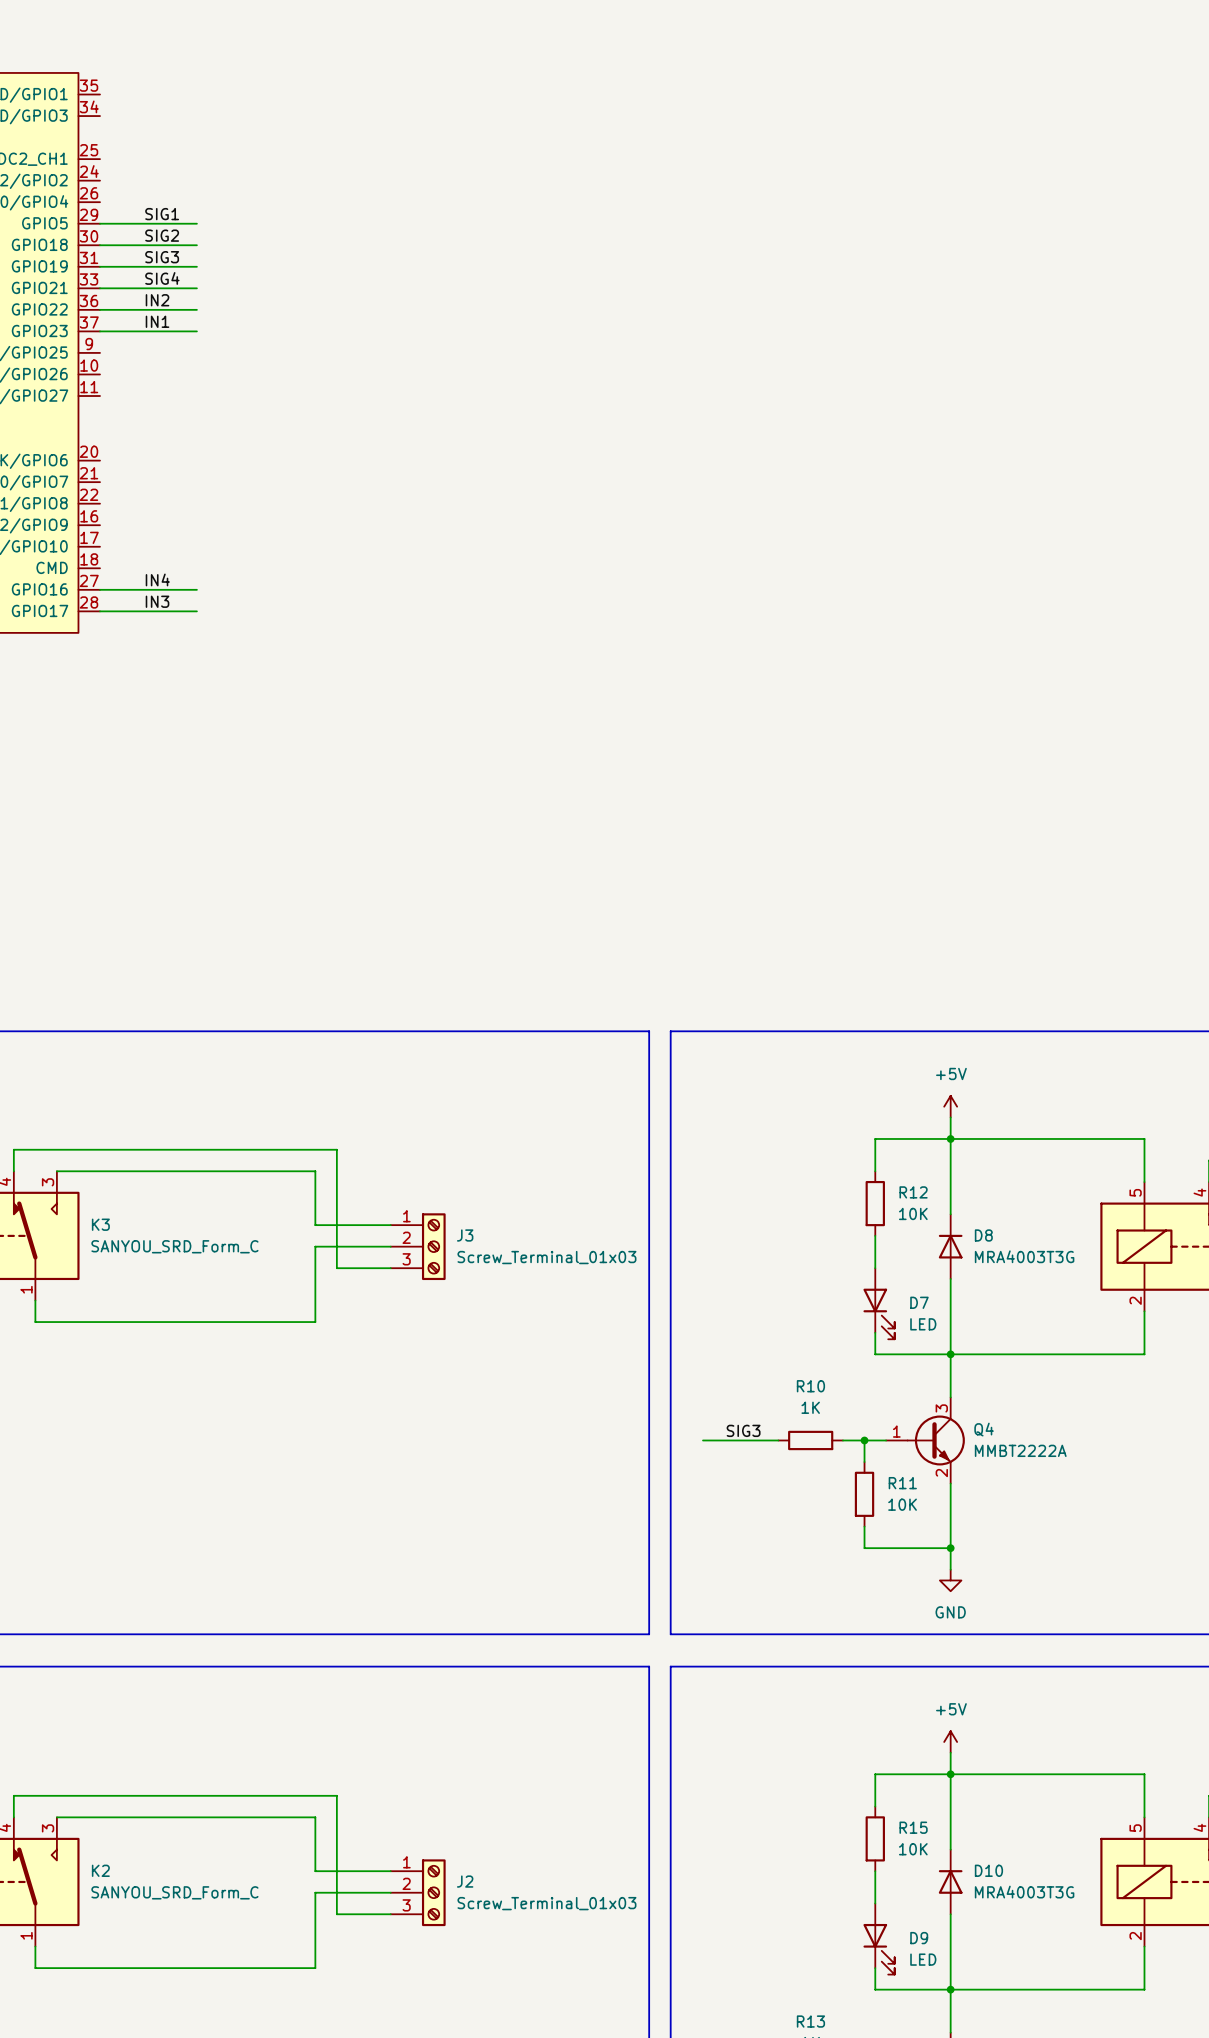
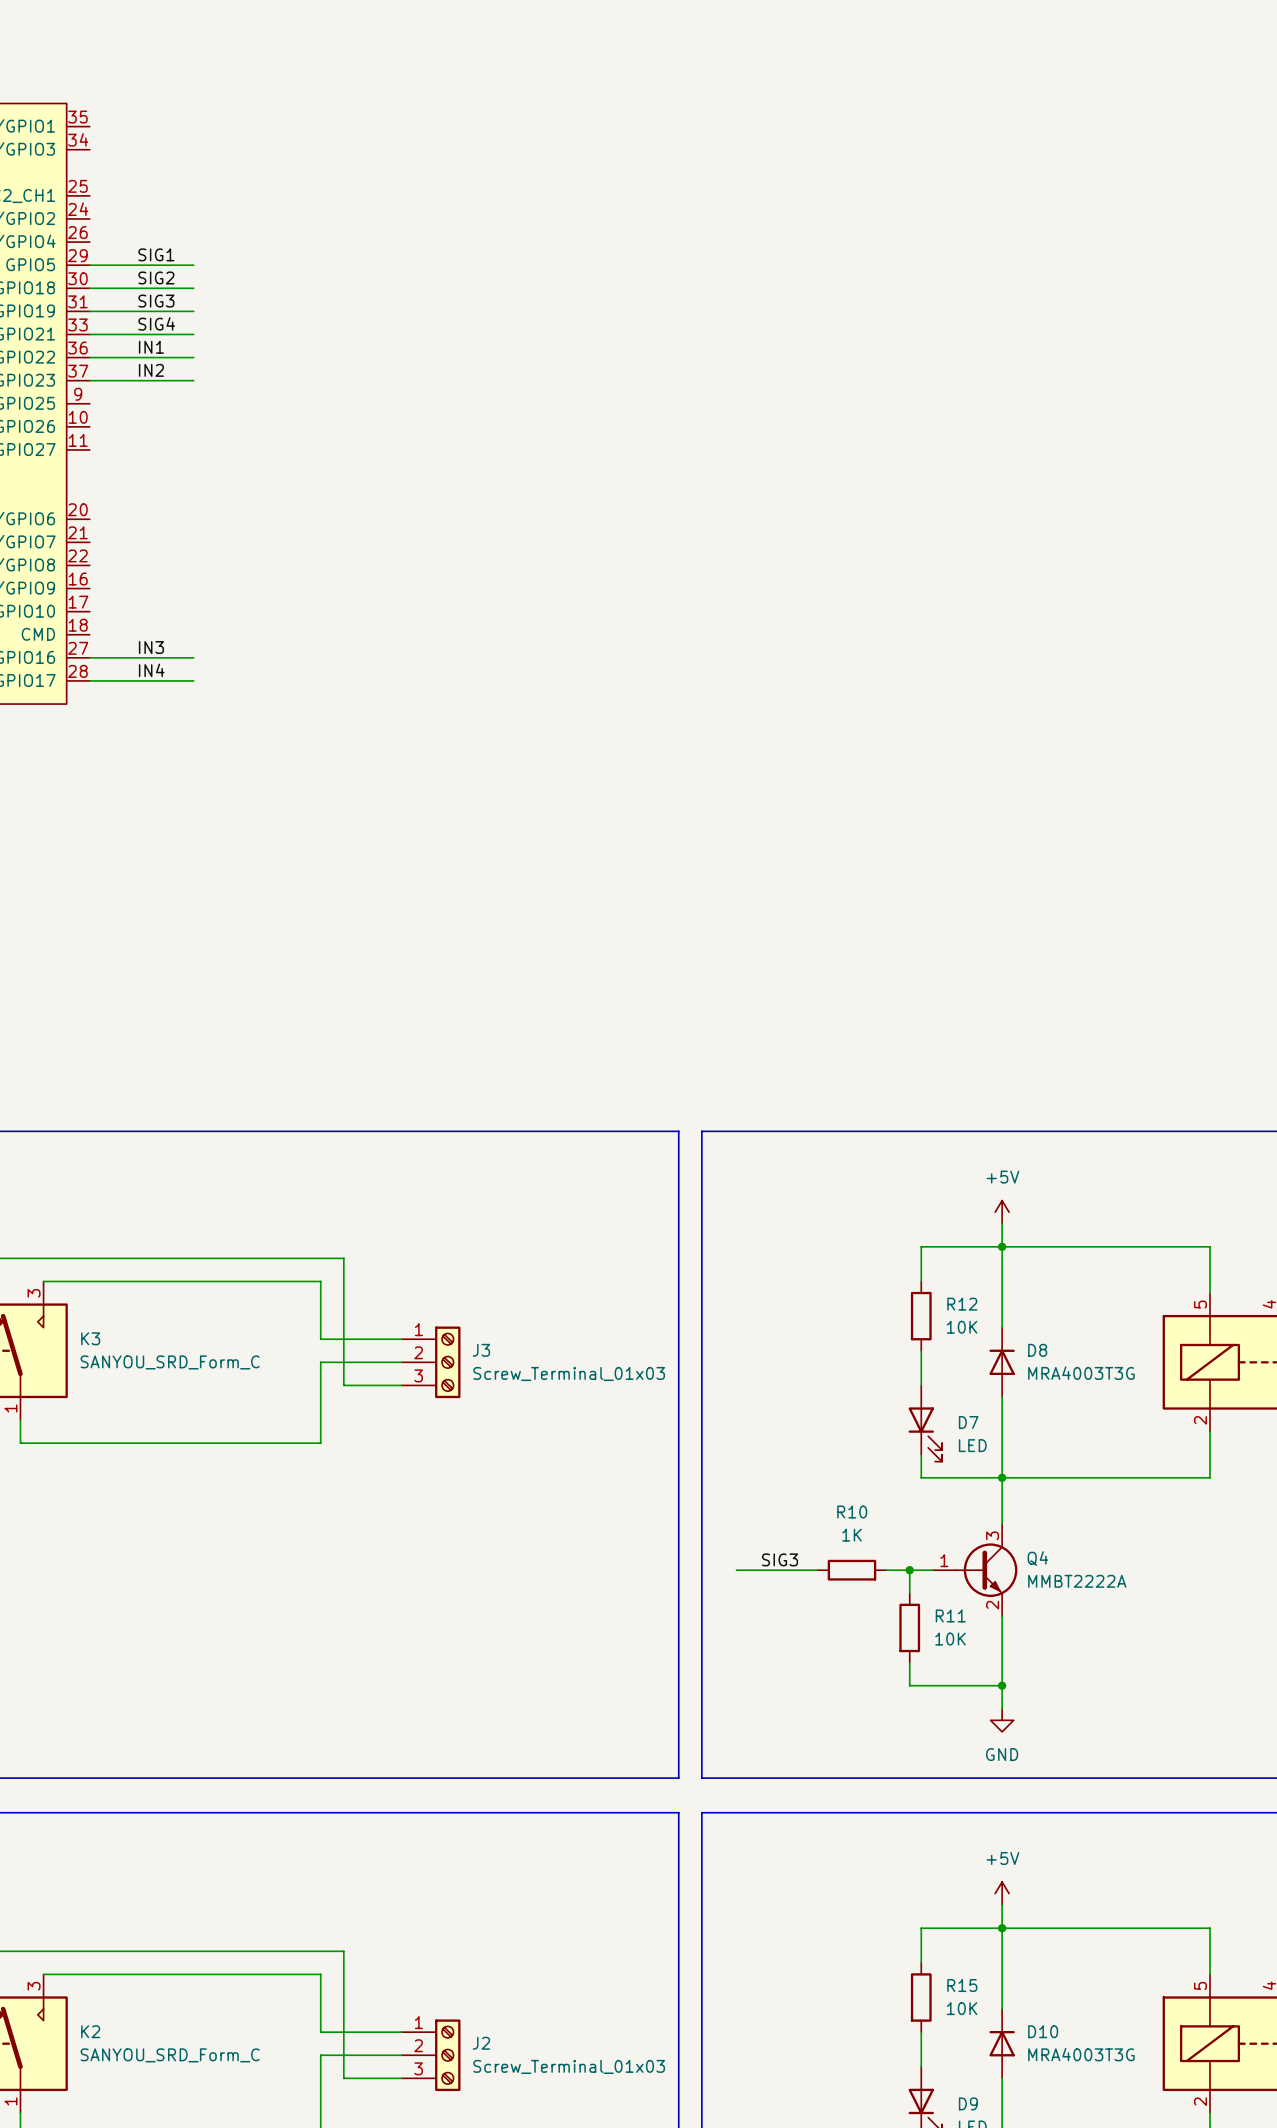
label: IN2 (157, 300) -> IN1 (151, 347)
label: IN1 (157, 321) -> IN2 (151, 370)
label: IN4 (157, 579) -> IN3 (151, 647)
label: IN3 (157, 601) -> IN4 (151, 670)

